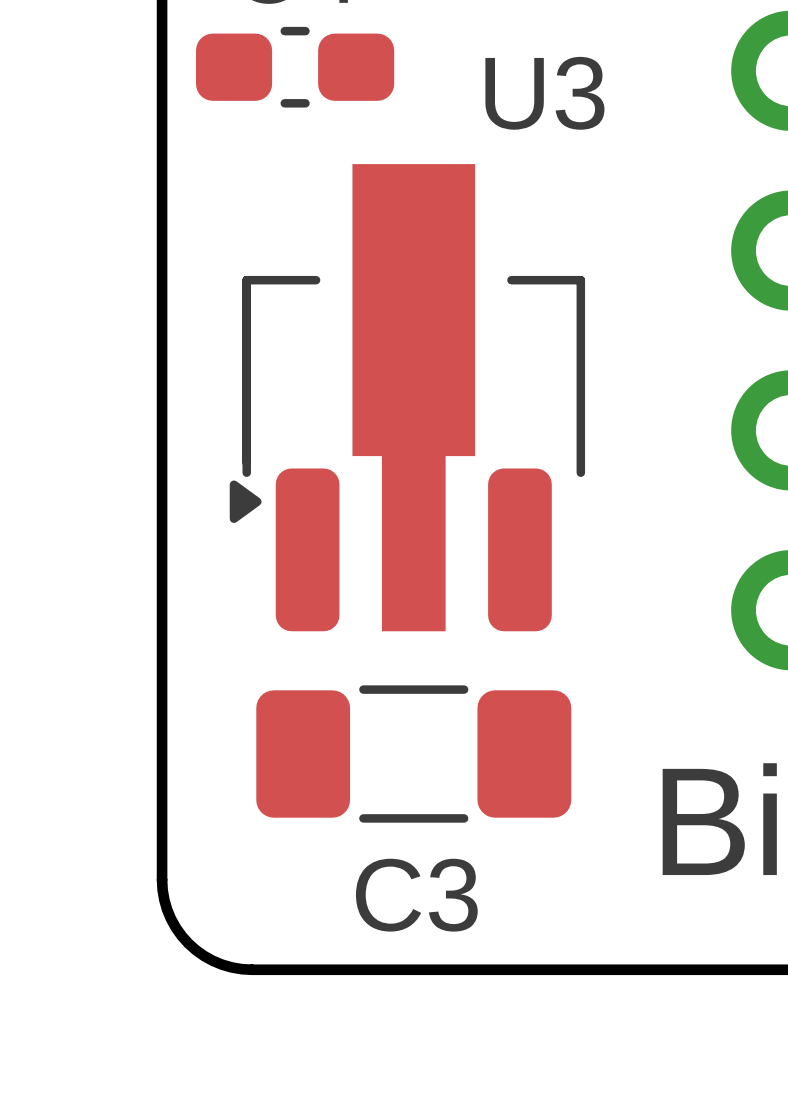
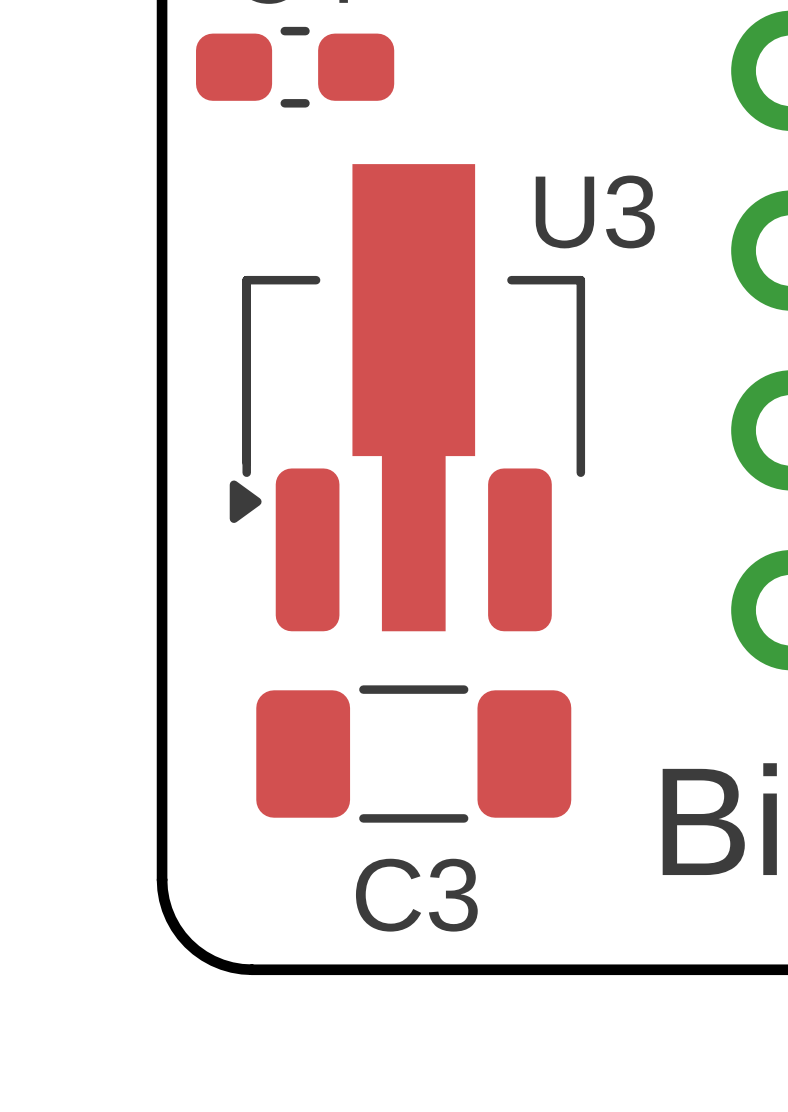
U3 name position: U3 (544, 93) -> U3 (595, 211)

